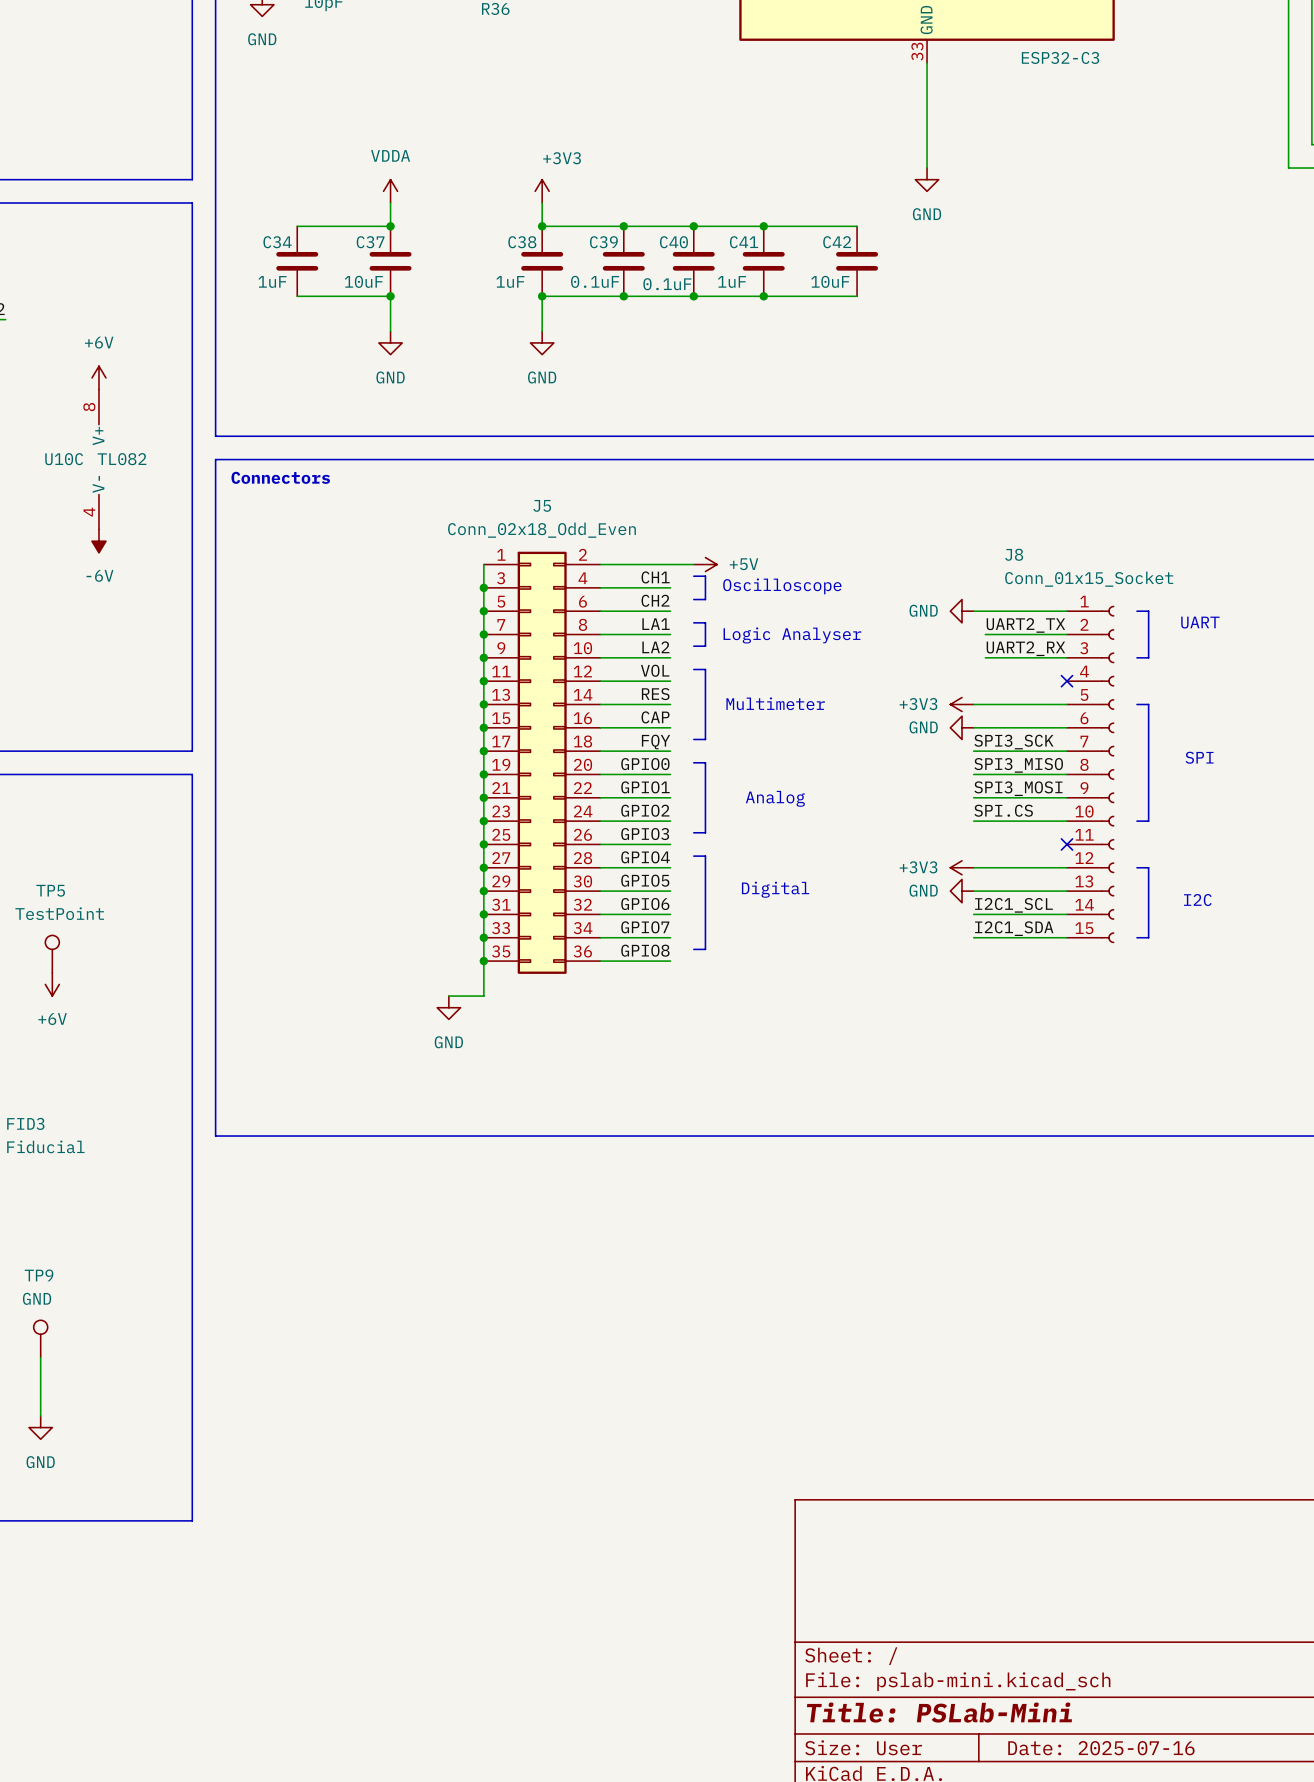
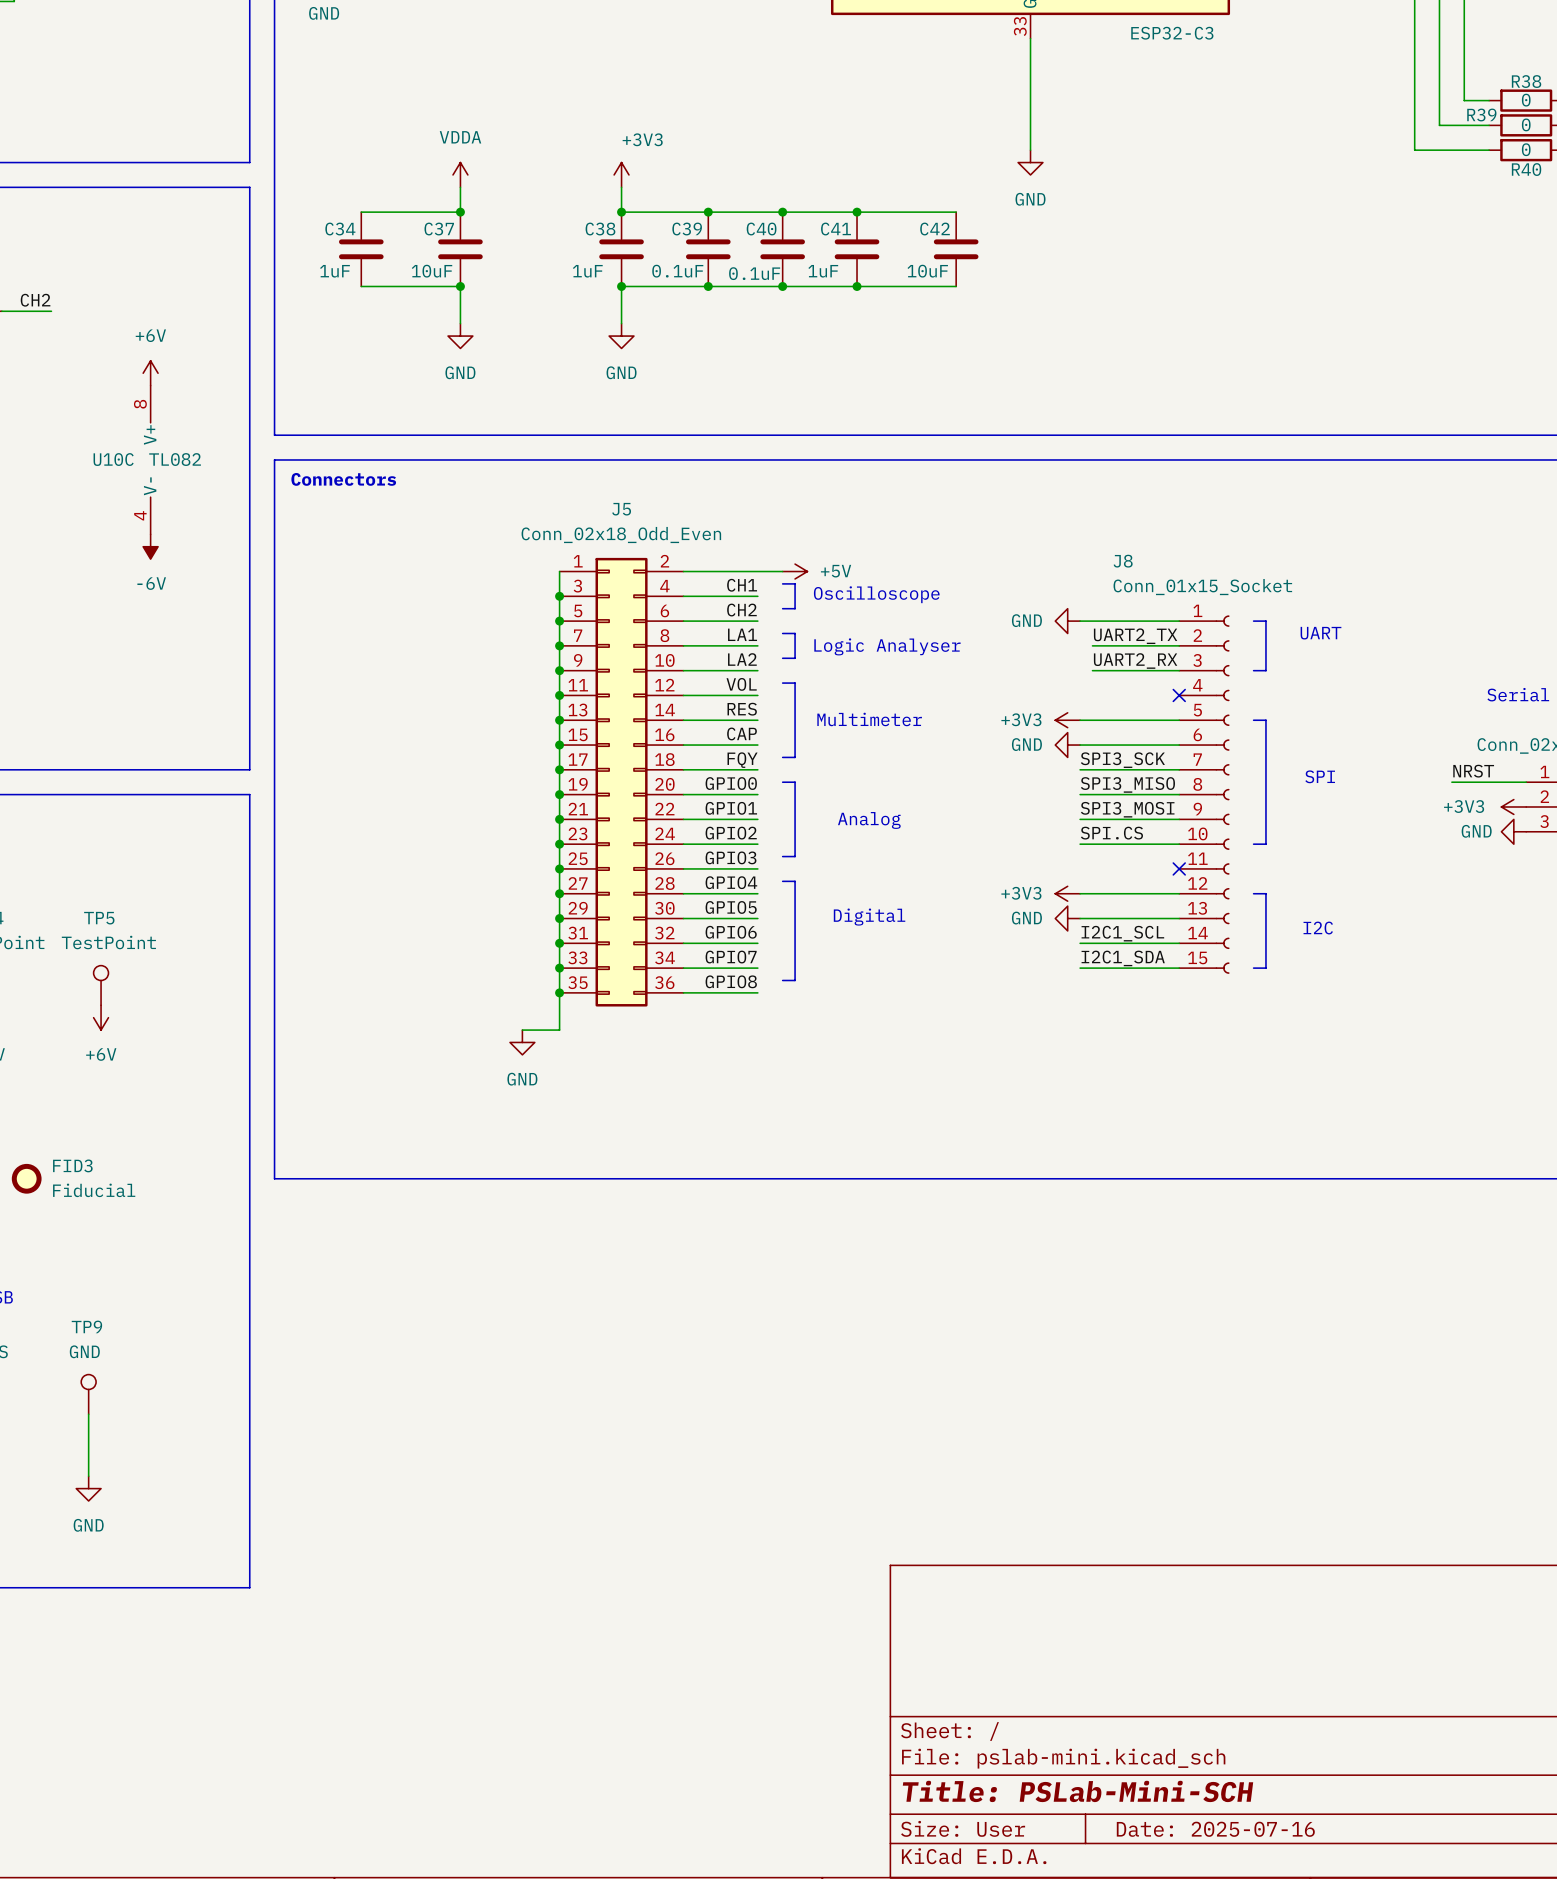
title block: Title: PSLab-Mini (939, 1712) -> Title: PSLab-Mini-SCH (1078, 1791)

